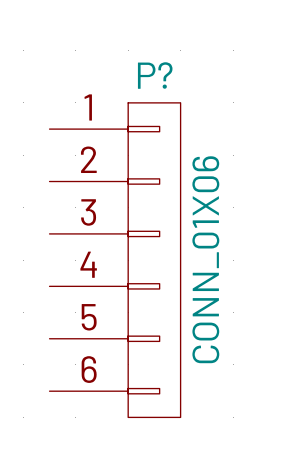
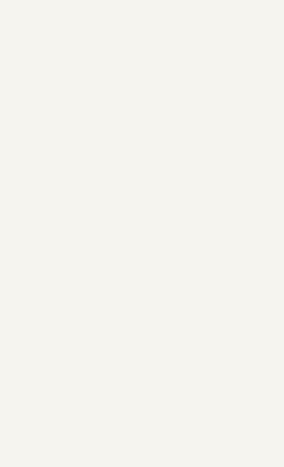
P?: CONN_01X06 (115, 260) -> none

